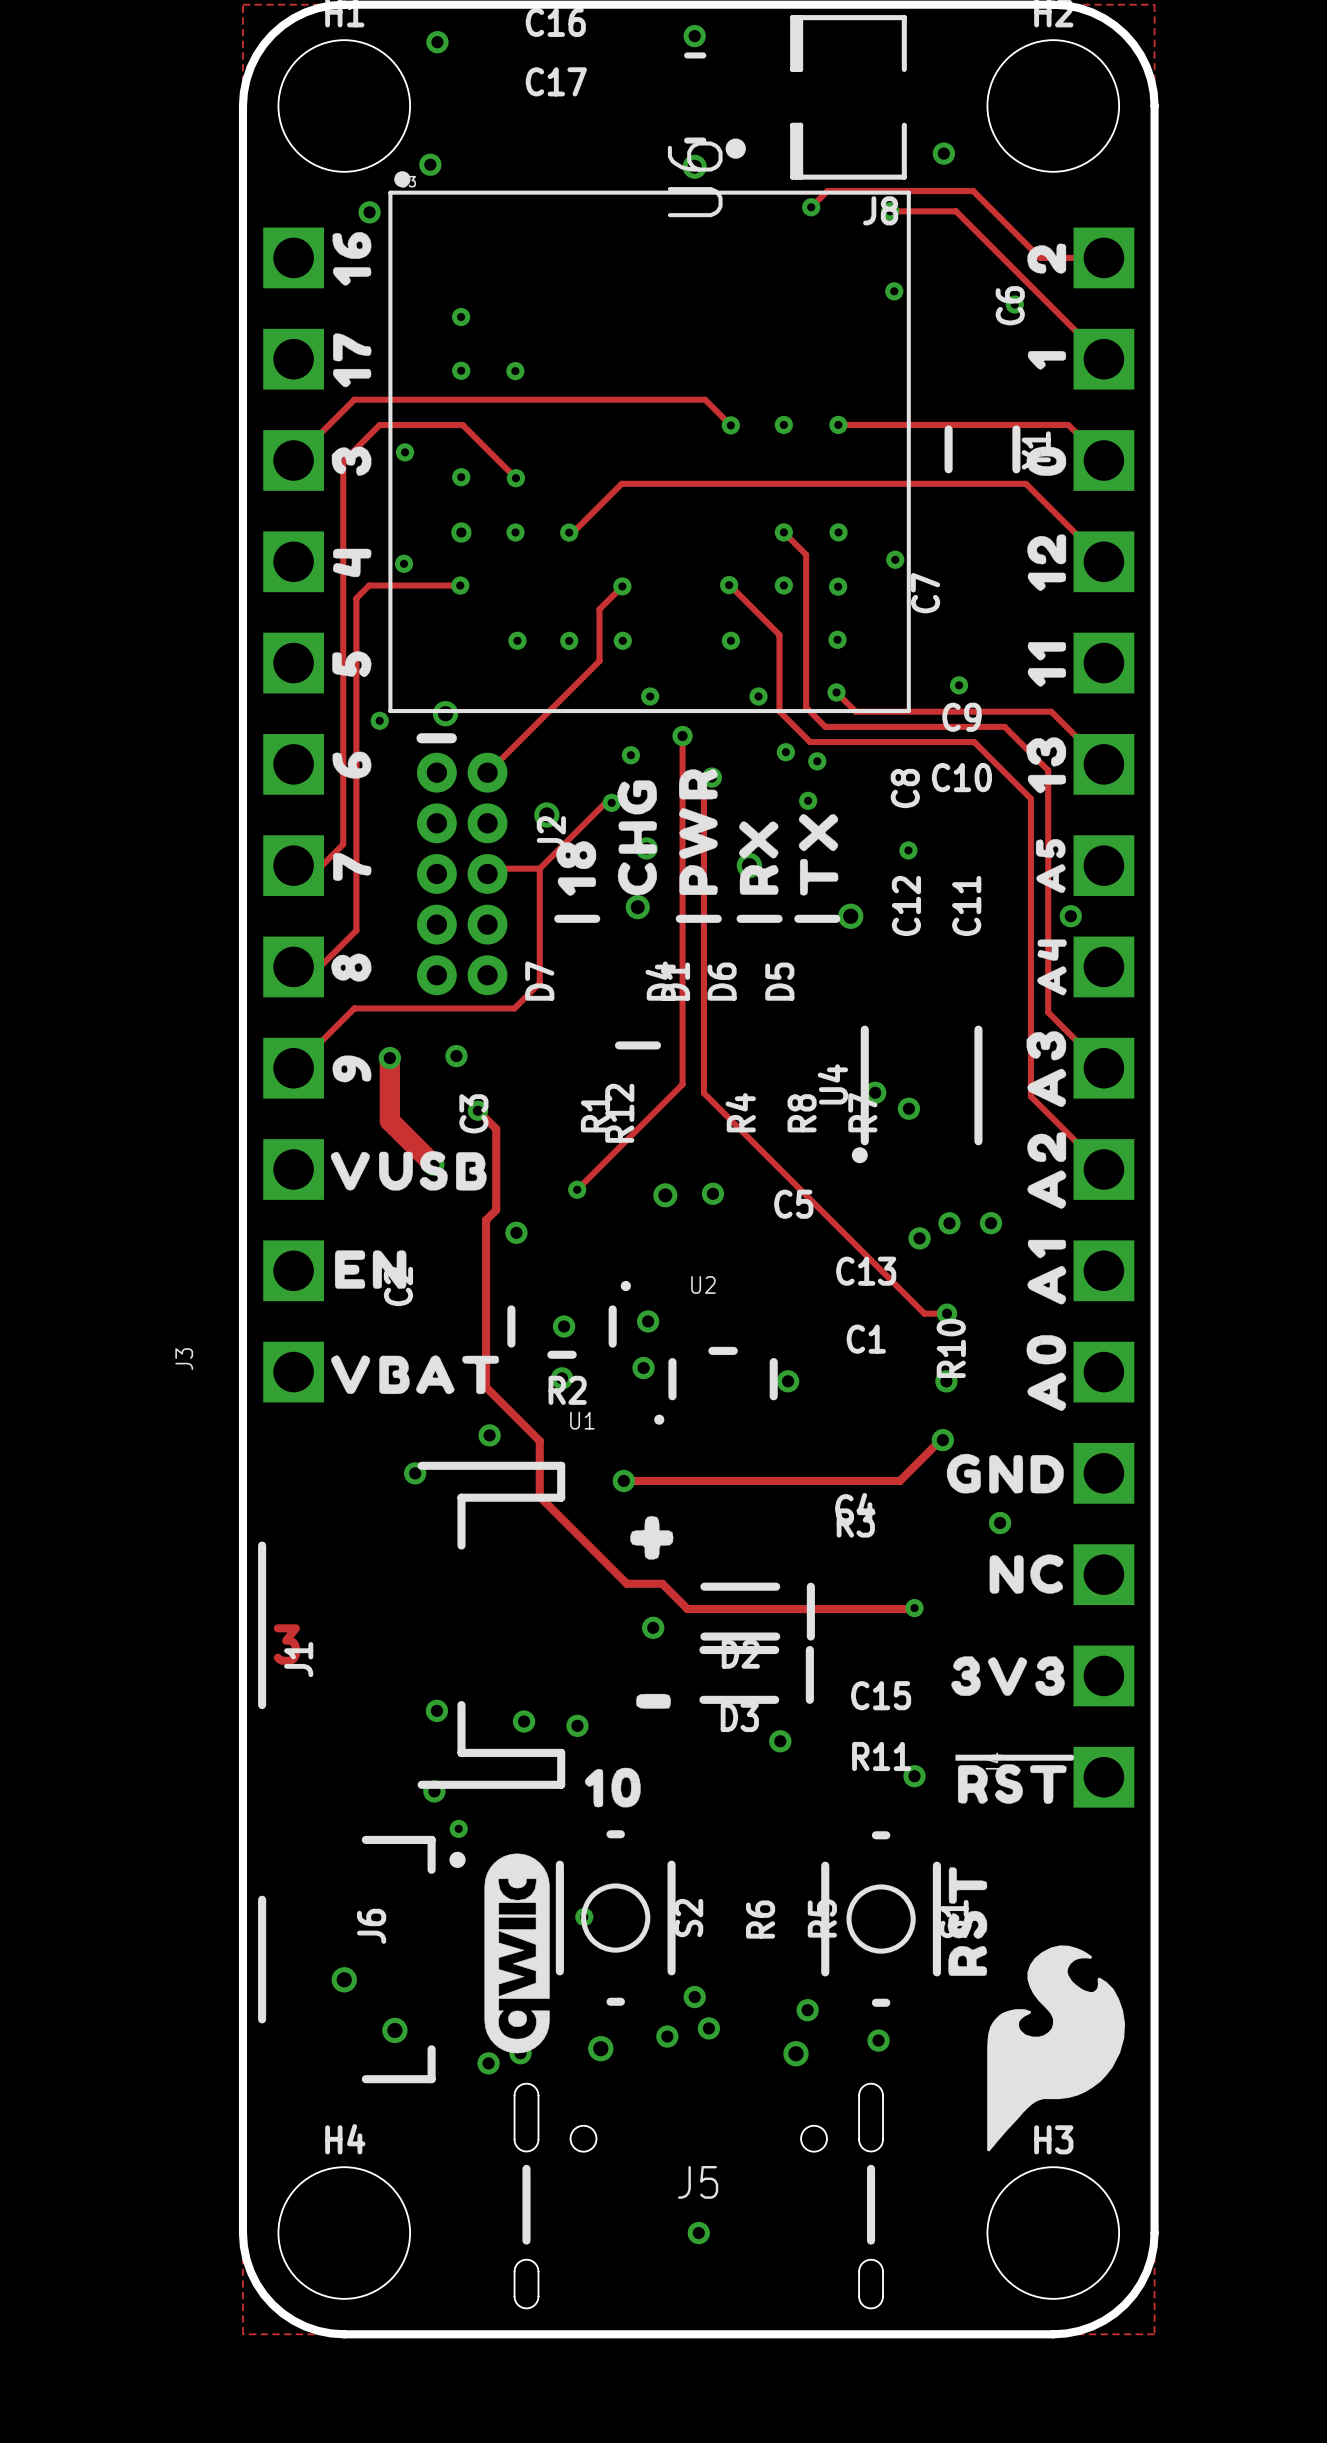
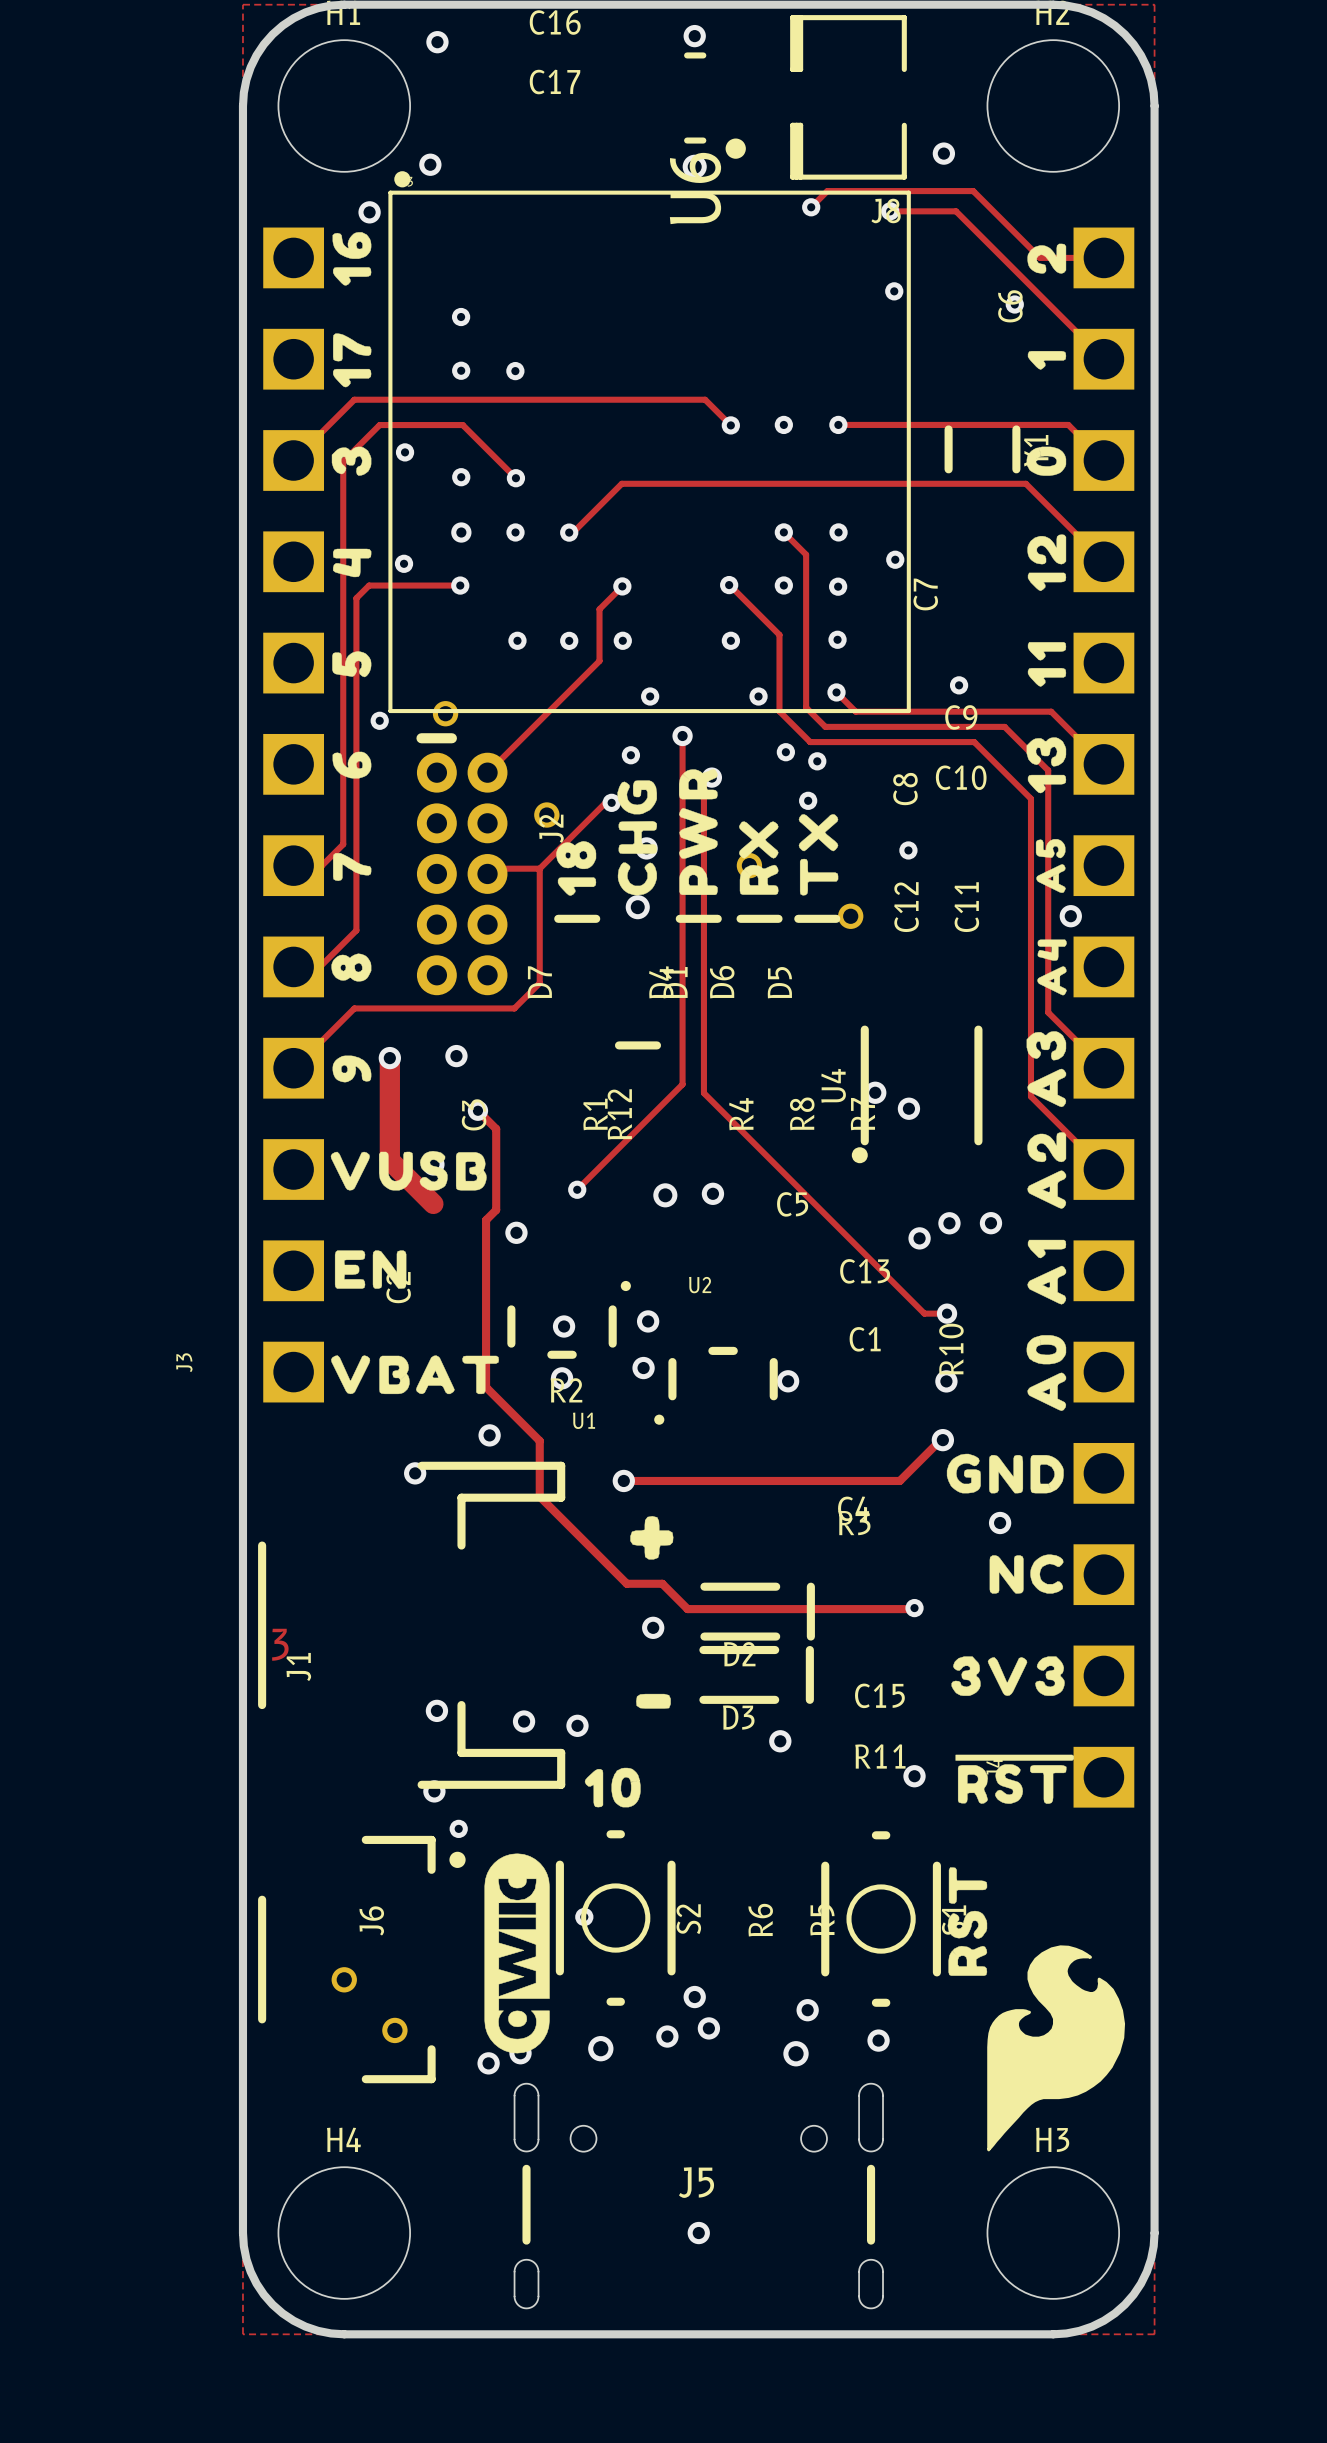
track: (389, 1120) (433, 1164) -> (389, 1120) (389, 1160) (433, 1203)

